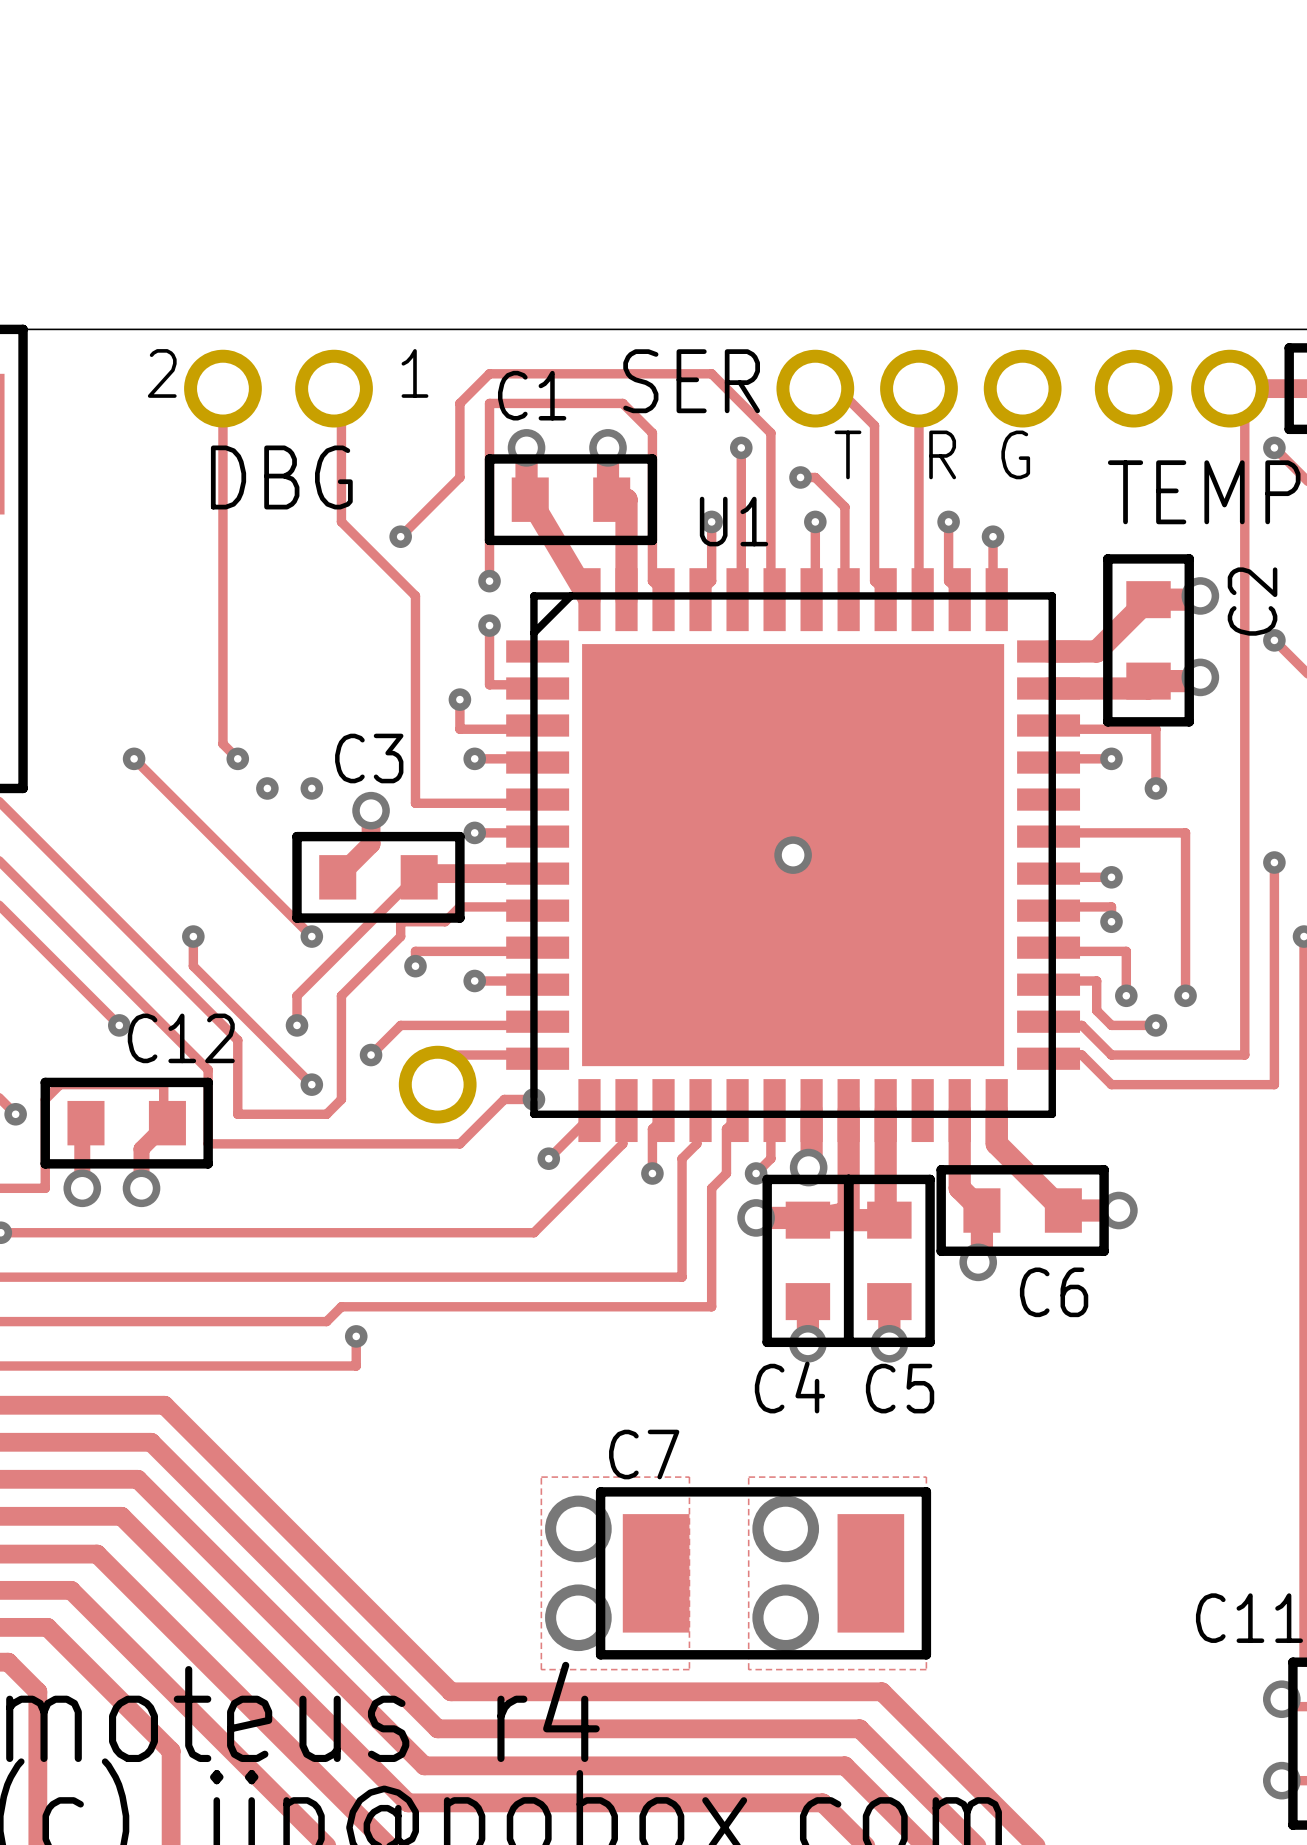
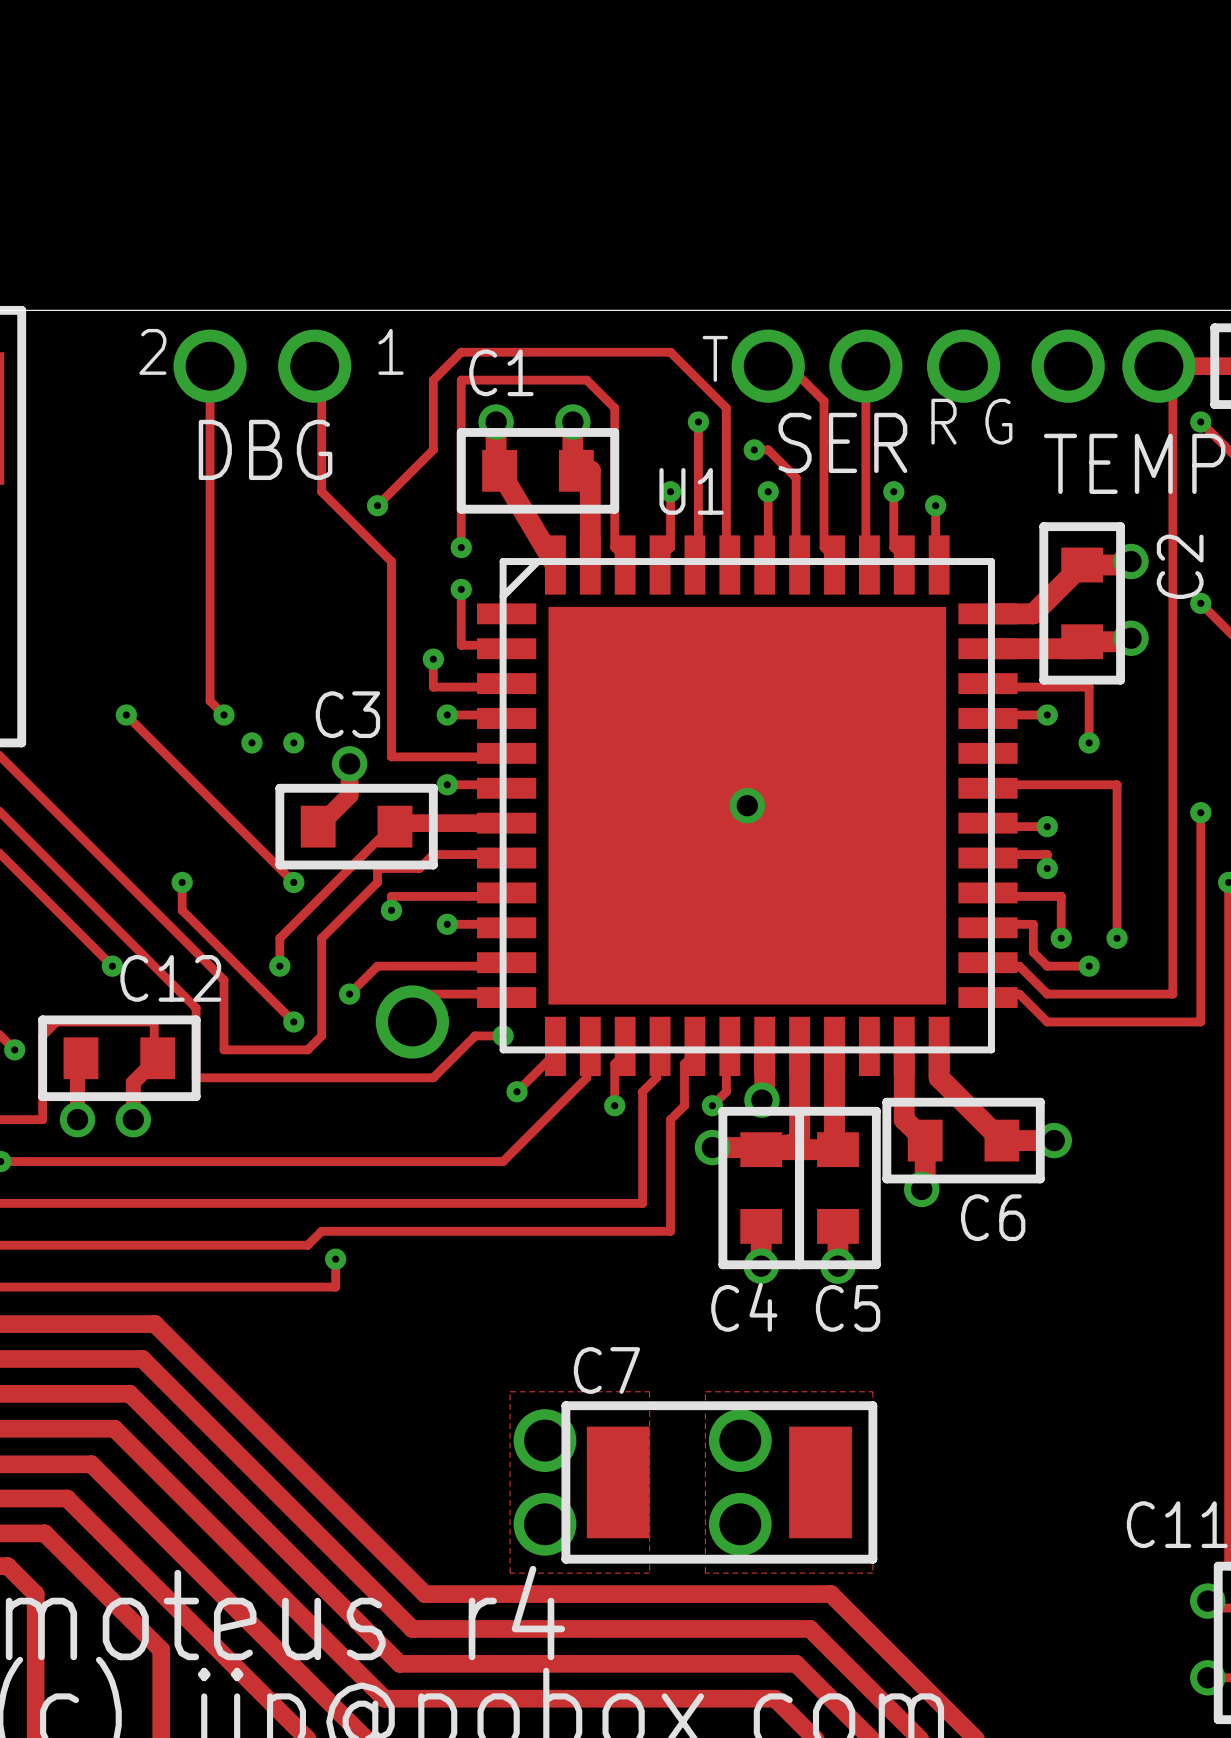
text: none -> T (715, 358)
text: SER (691, 381) -> none
text: T (847, 454) -> SER (842, 442)
text position: R (942, 454) -> R (944, 421)
text position: G (1015, 454) -> G (998, 421)

